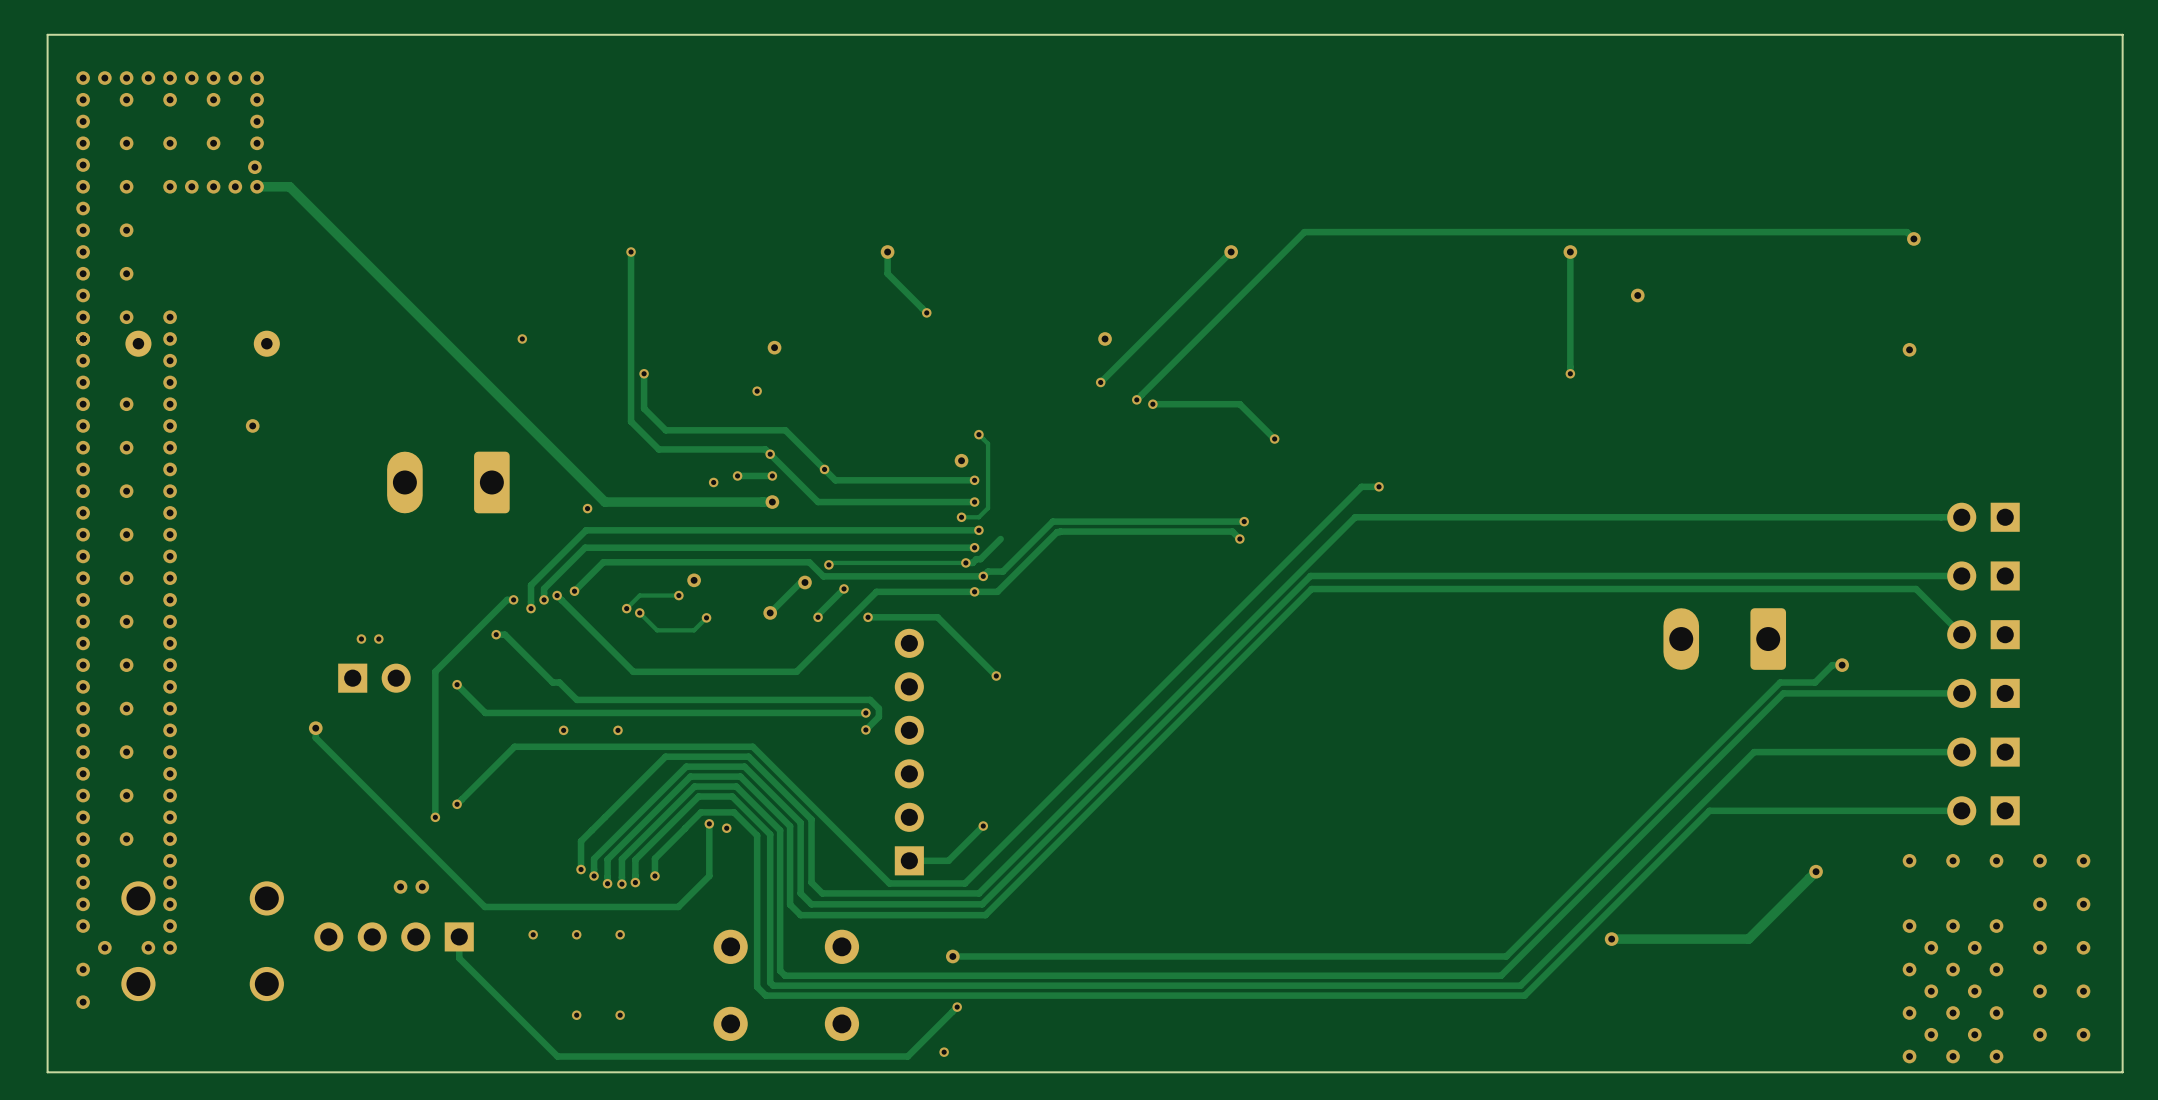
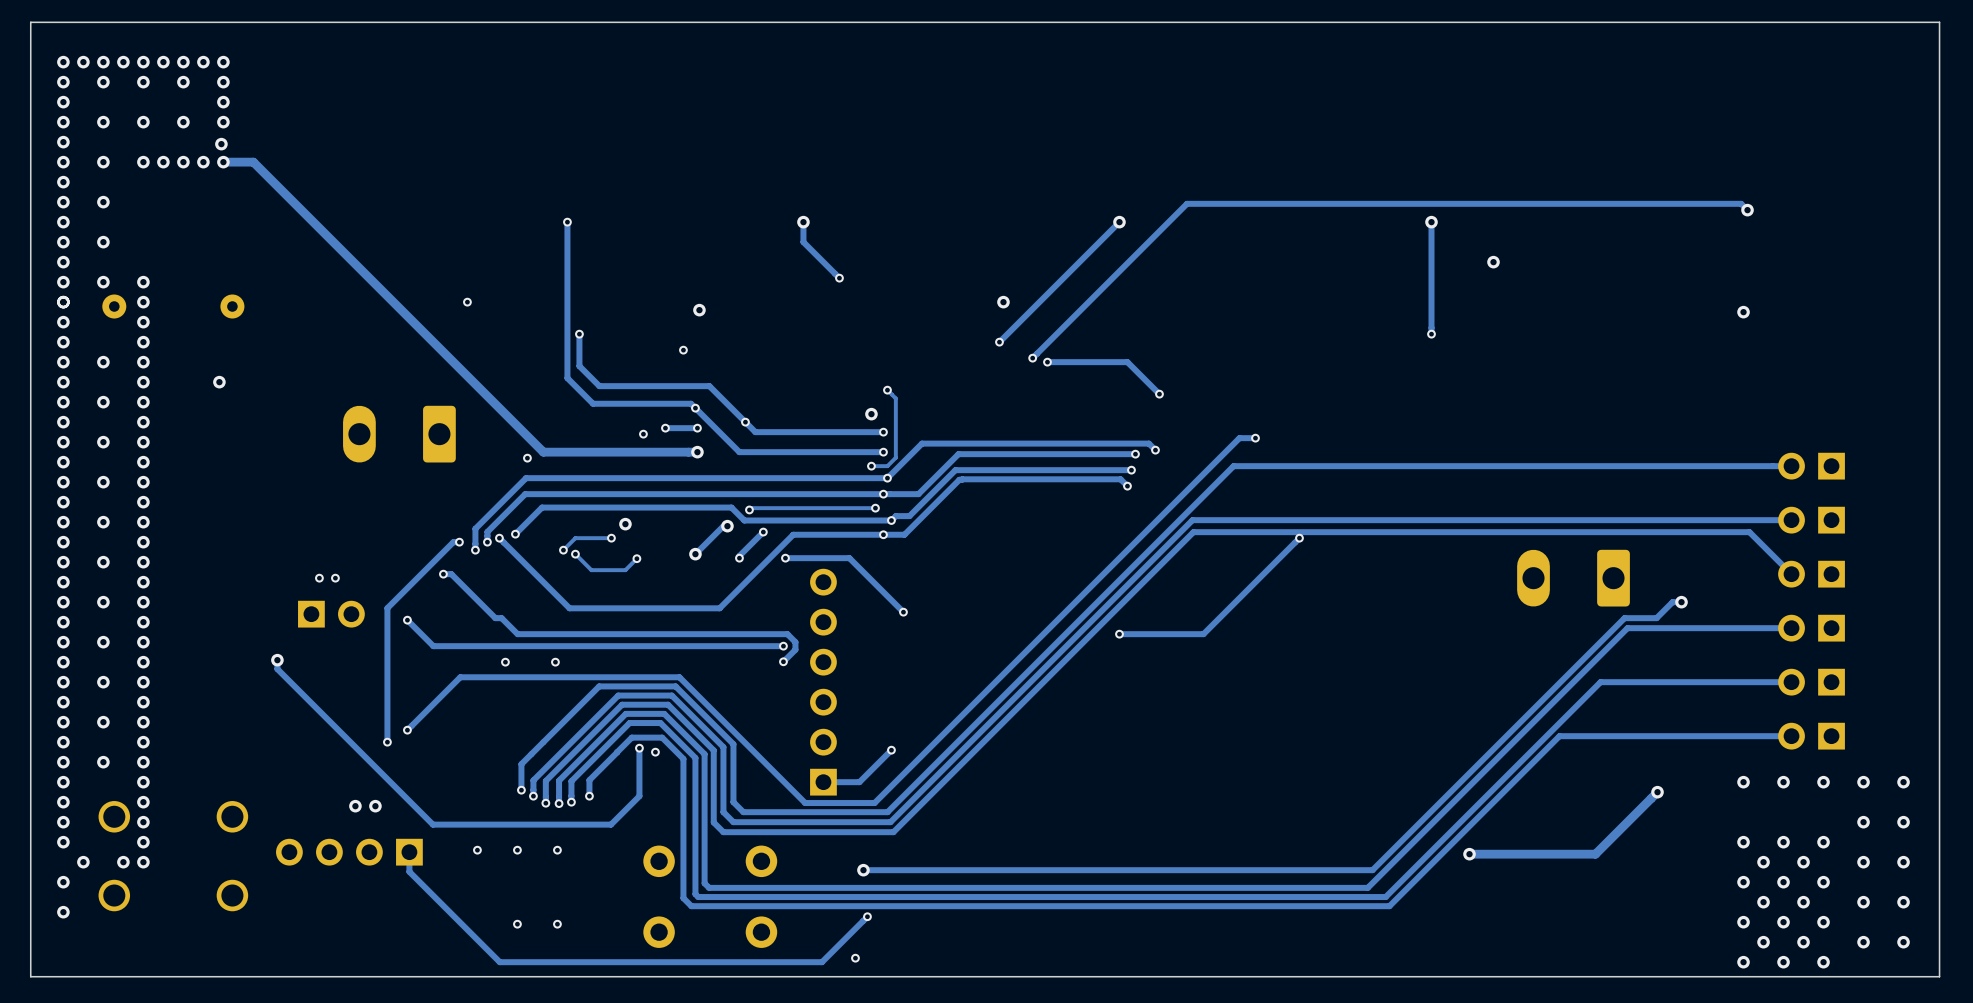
track: none -> (1155, 450) (1148, 443) (922, 443) (887, 478)
via: none -> (1155, 450)
track: none -> (1135, 454) (958, 454) (918, 494) (883, 494)
via: none -> (1135, 454)
track: (1000, 539) (980, 559) (976, 559) (972, 562) (965, 562) -> none
track: none -> (1299, 538) (1203, 634) (1119, 634)
via: none -> (1299, 538)
via: none -> (1119, 634)

